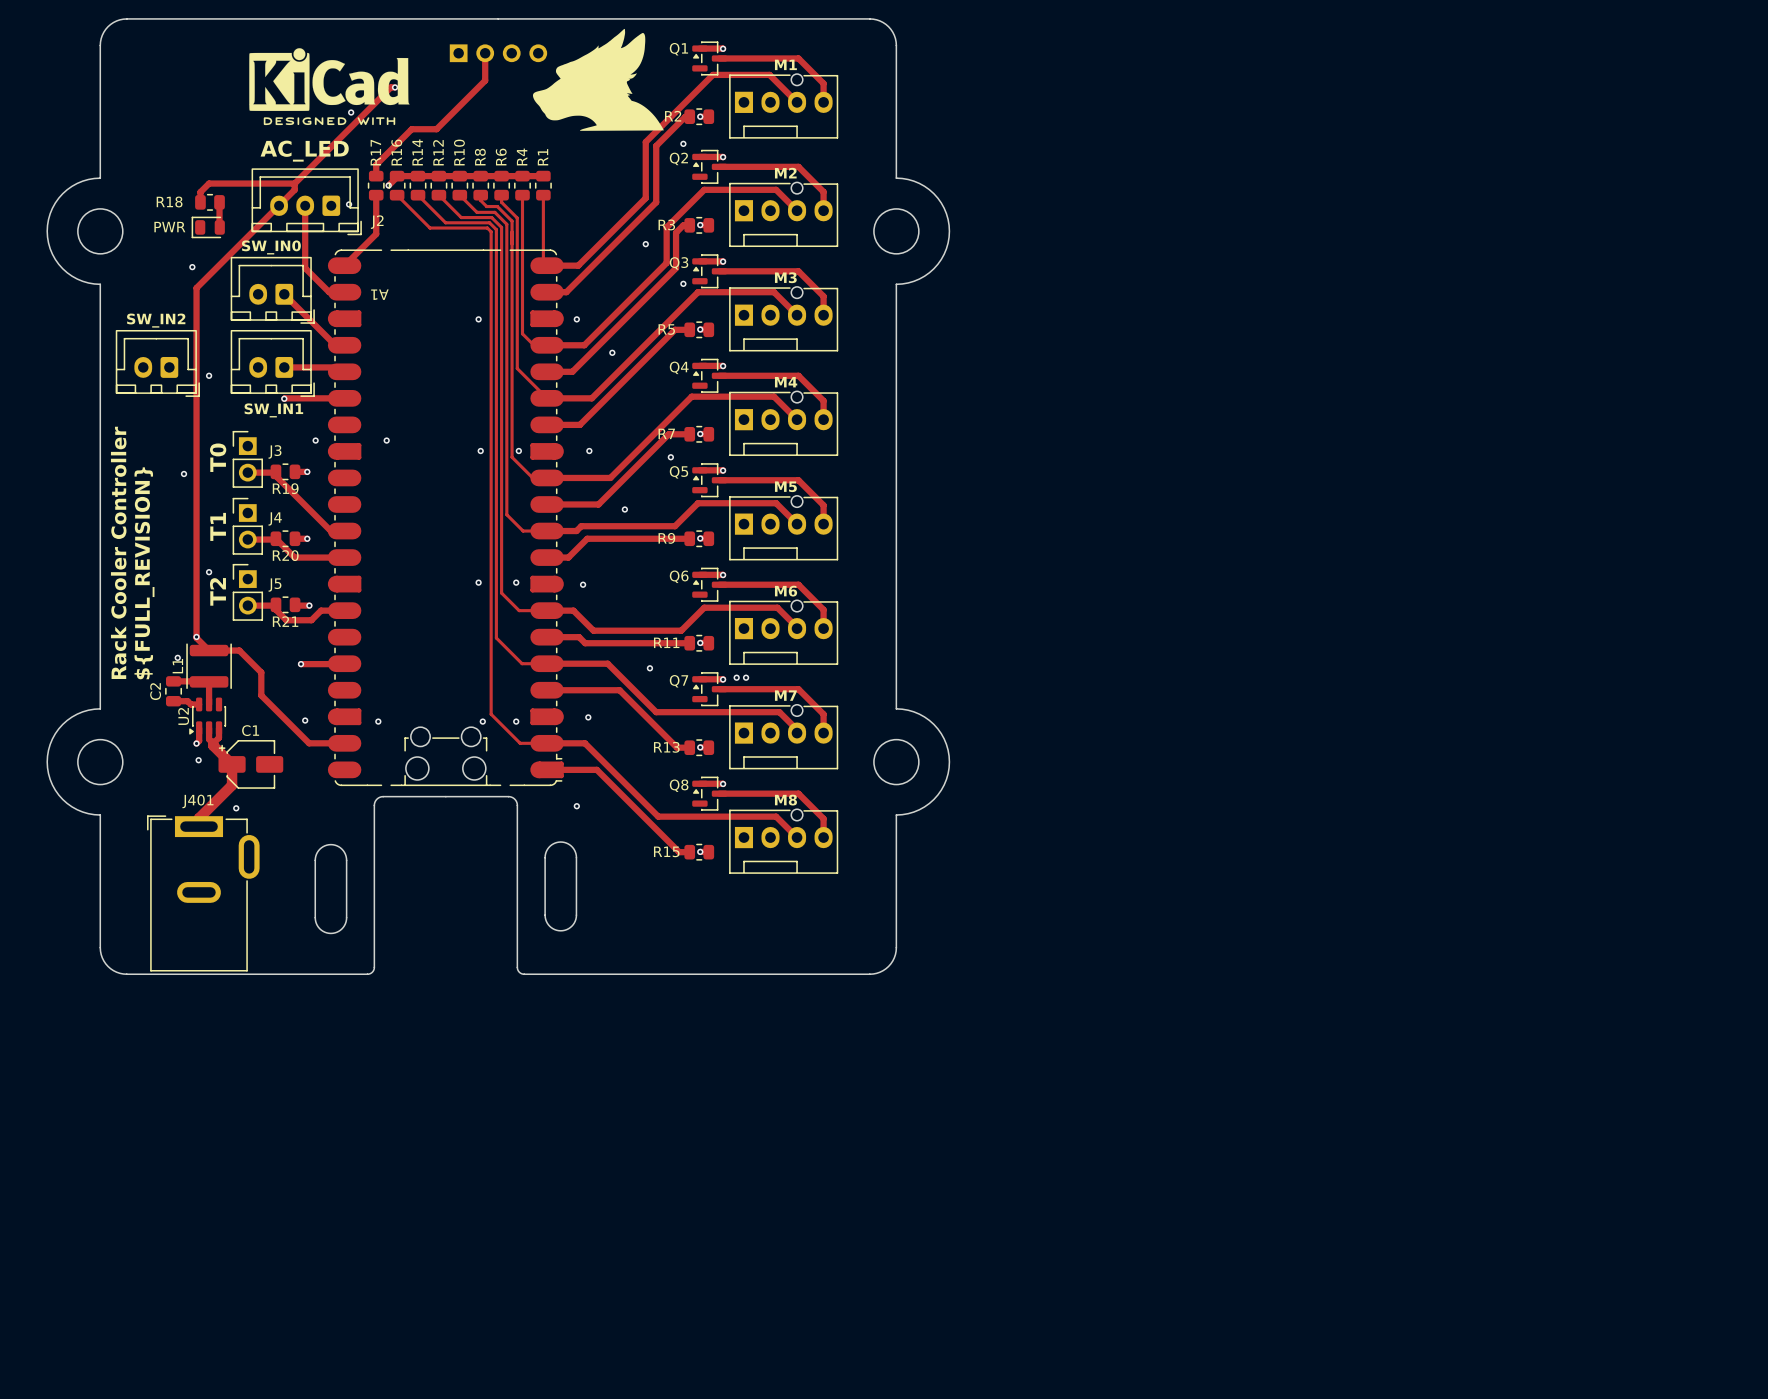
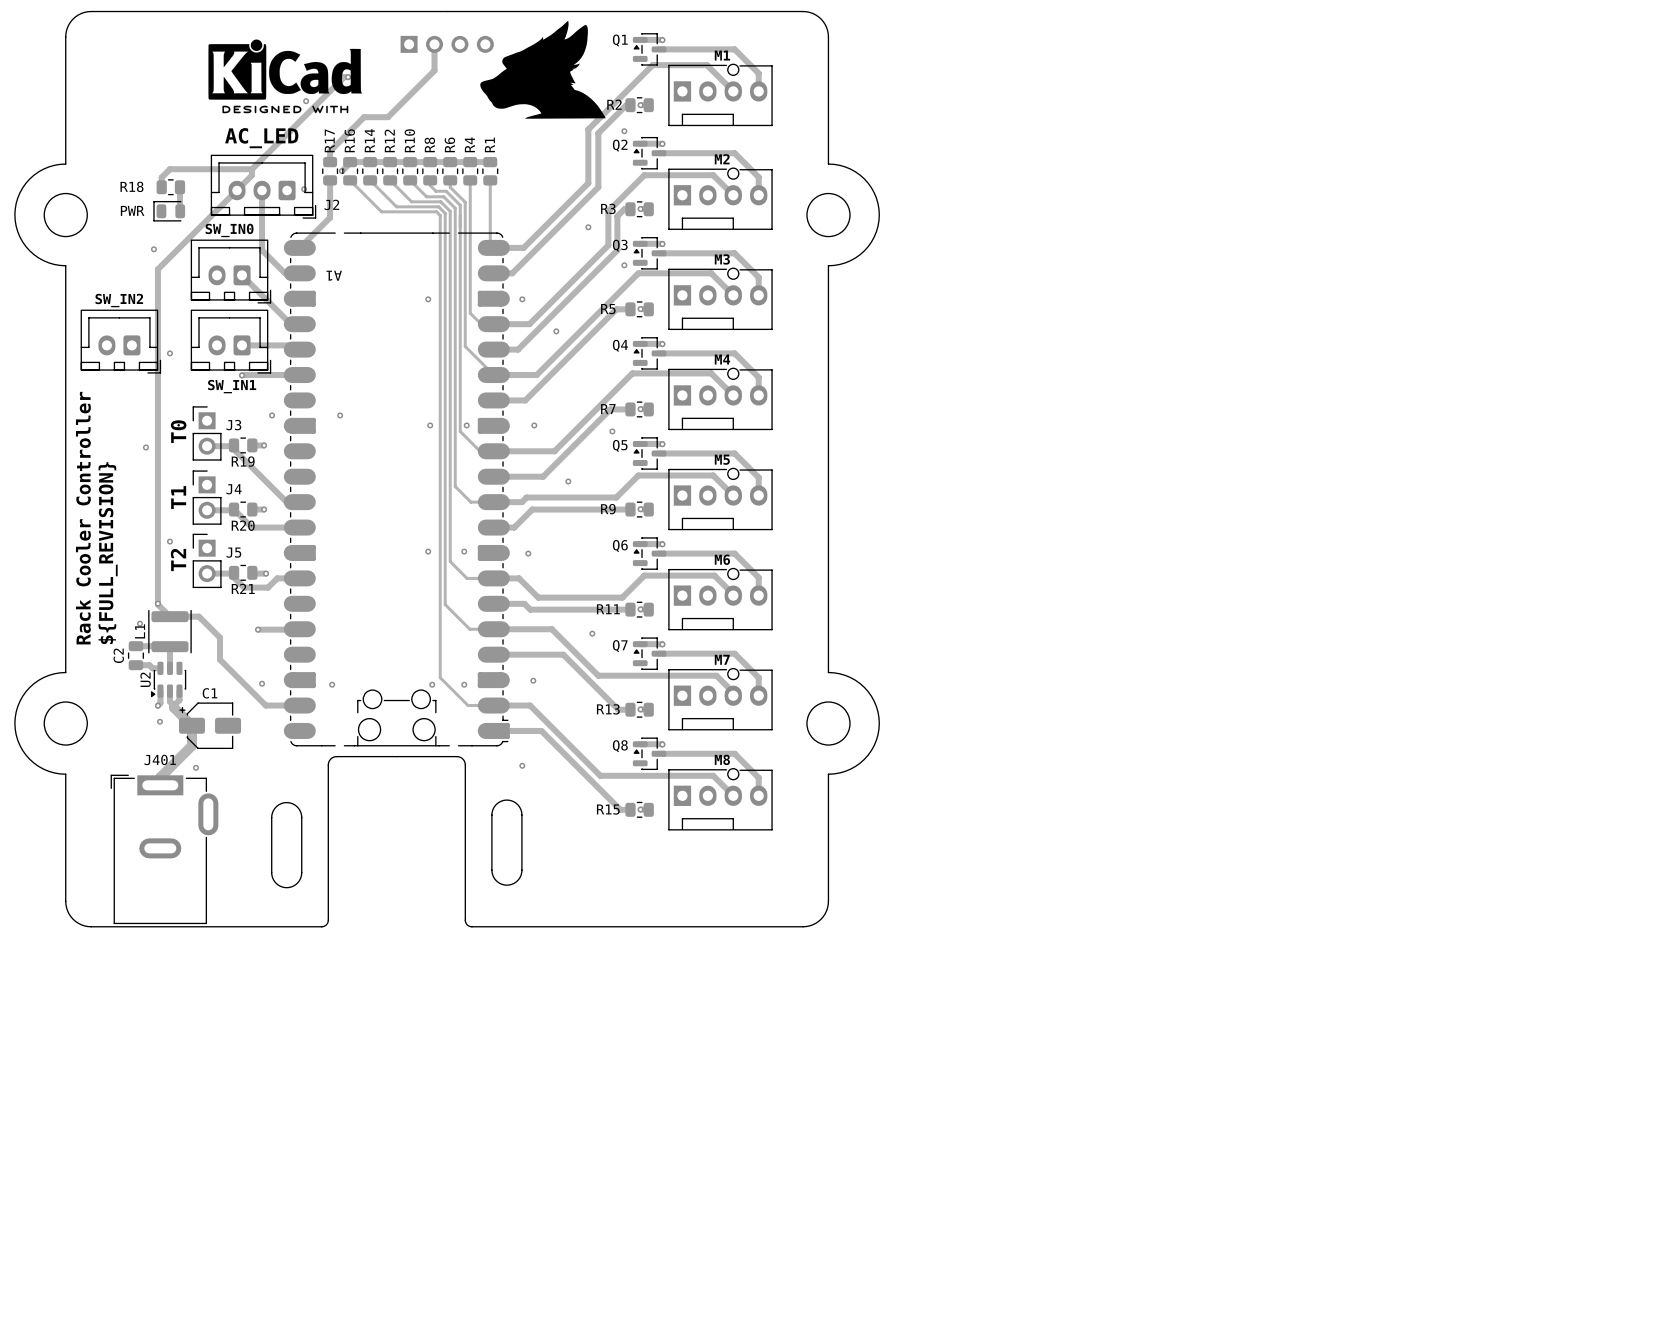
via: (736, 677) -> none
via: (746, 677) -> none

